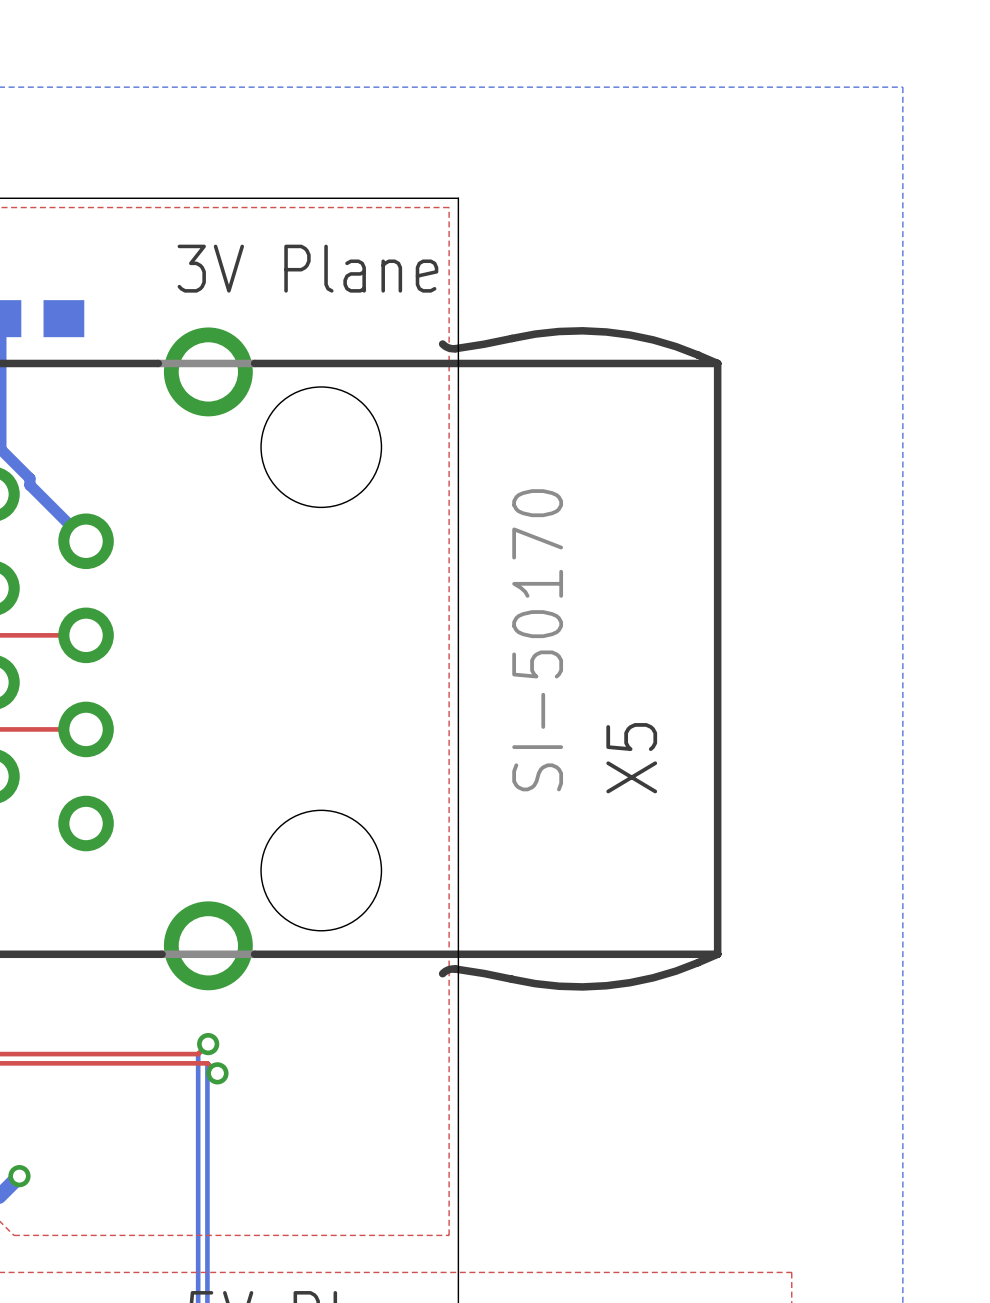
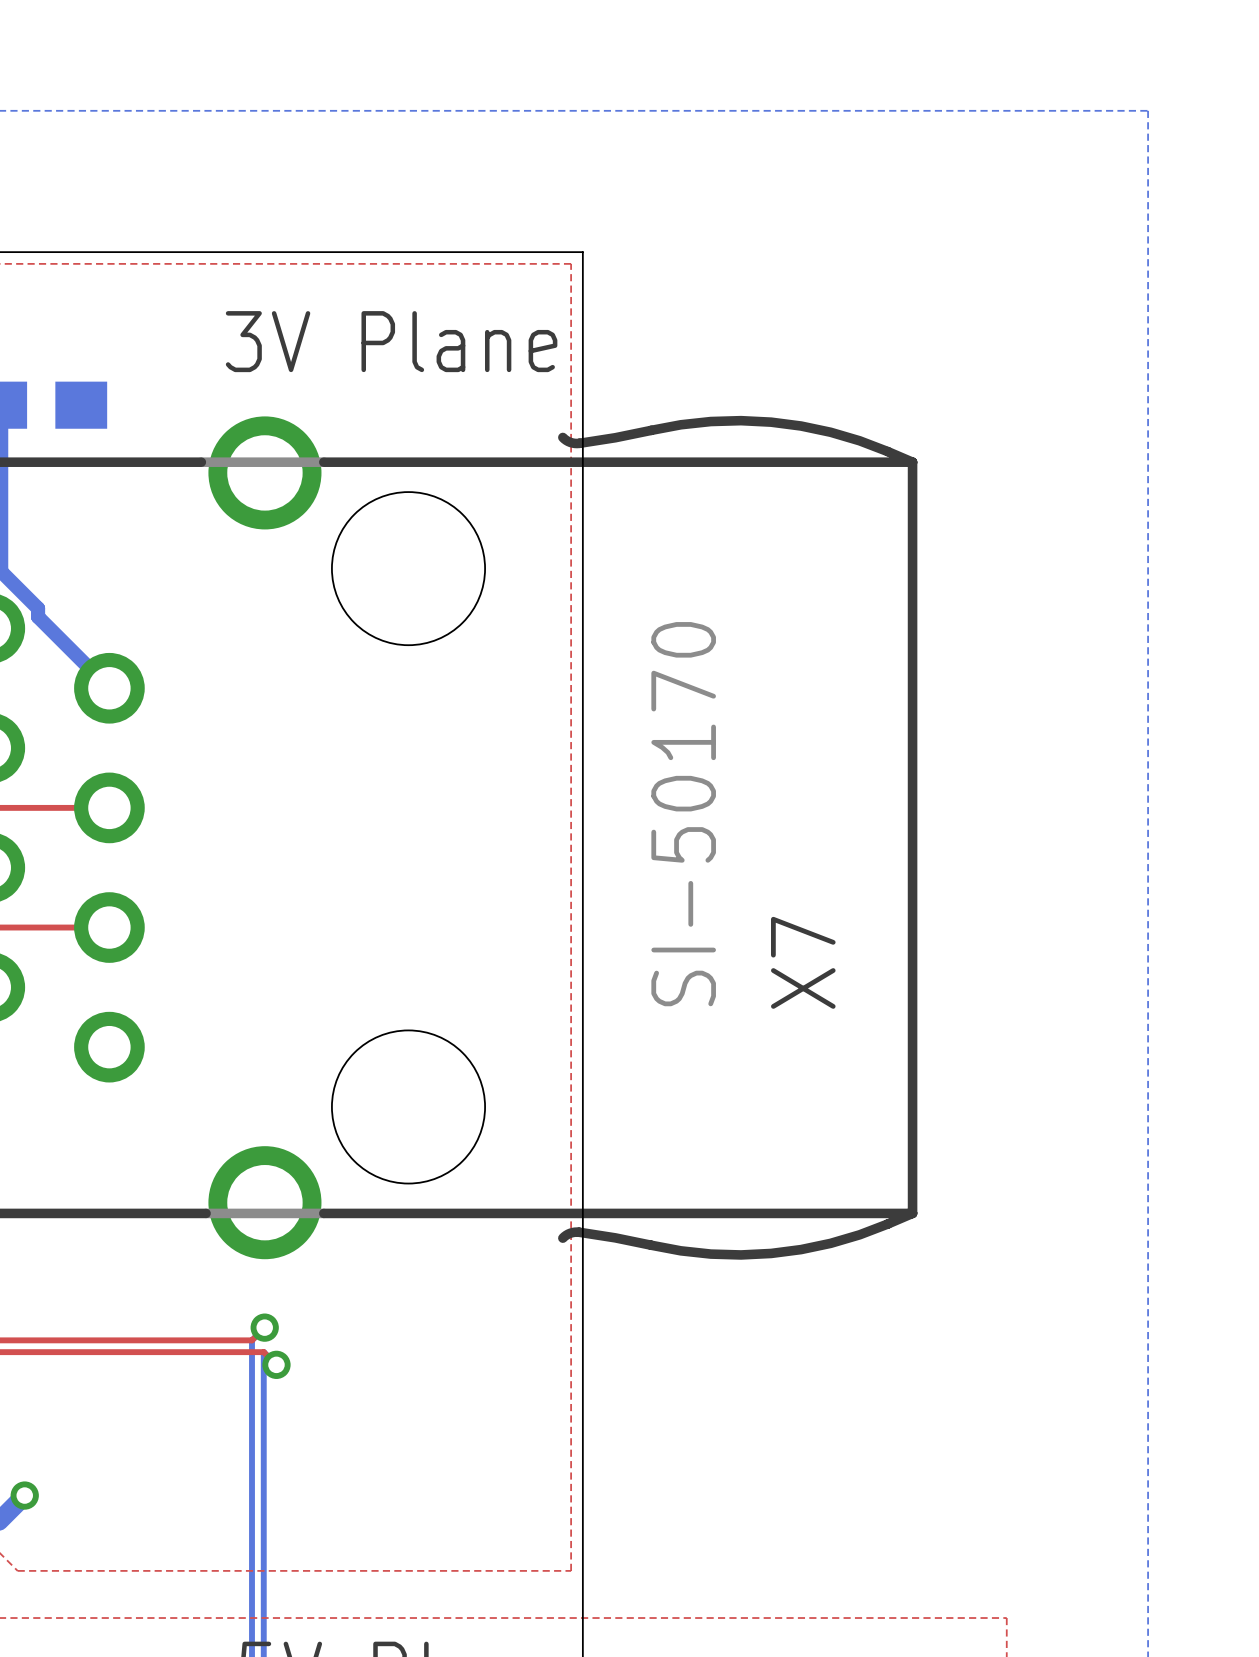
X5 name: X5 (631, 758) -> X7 (803, 962)

